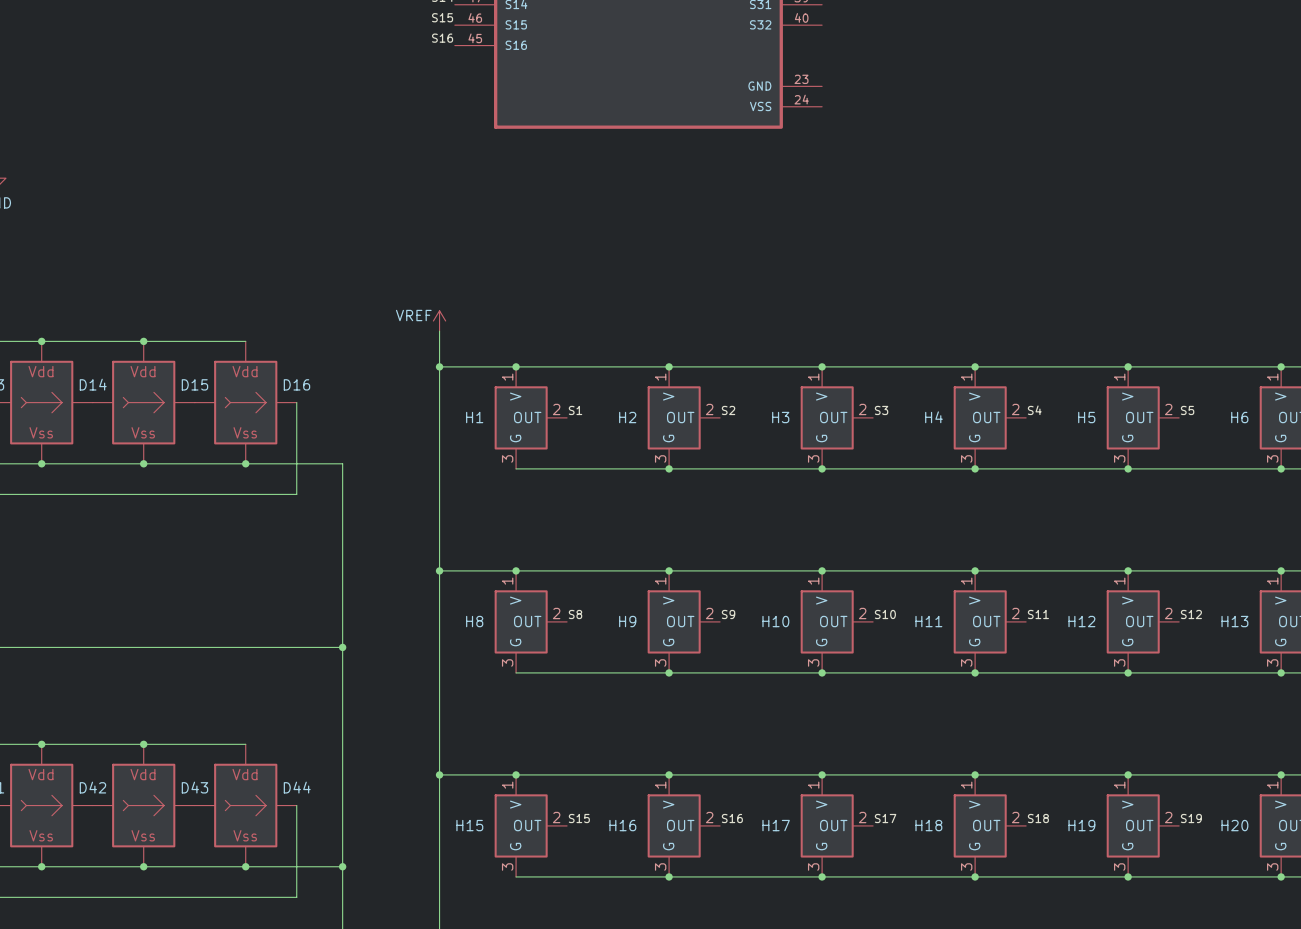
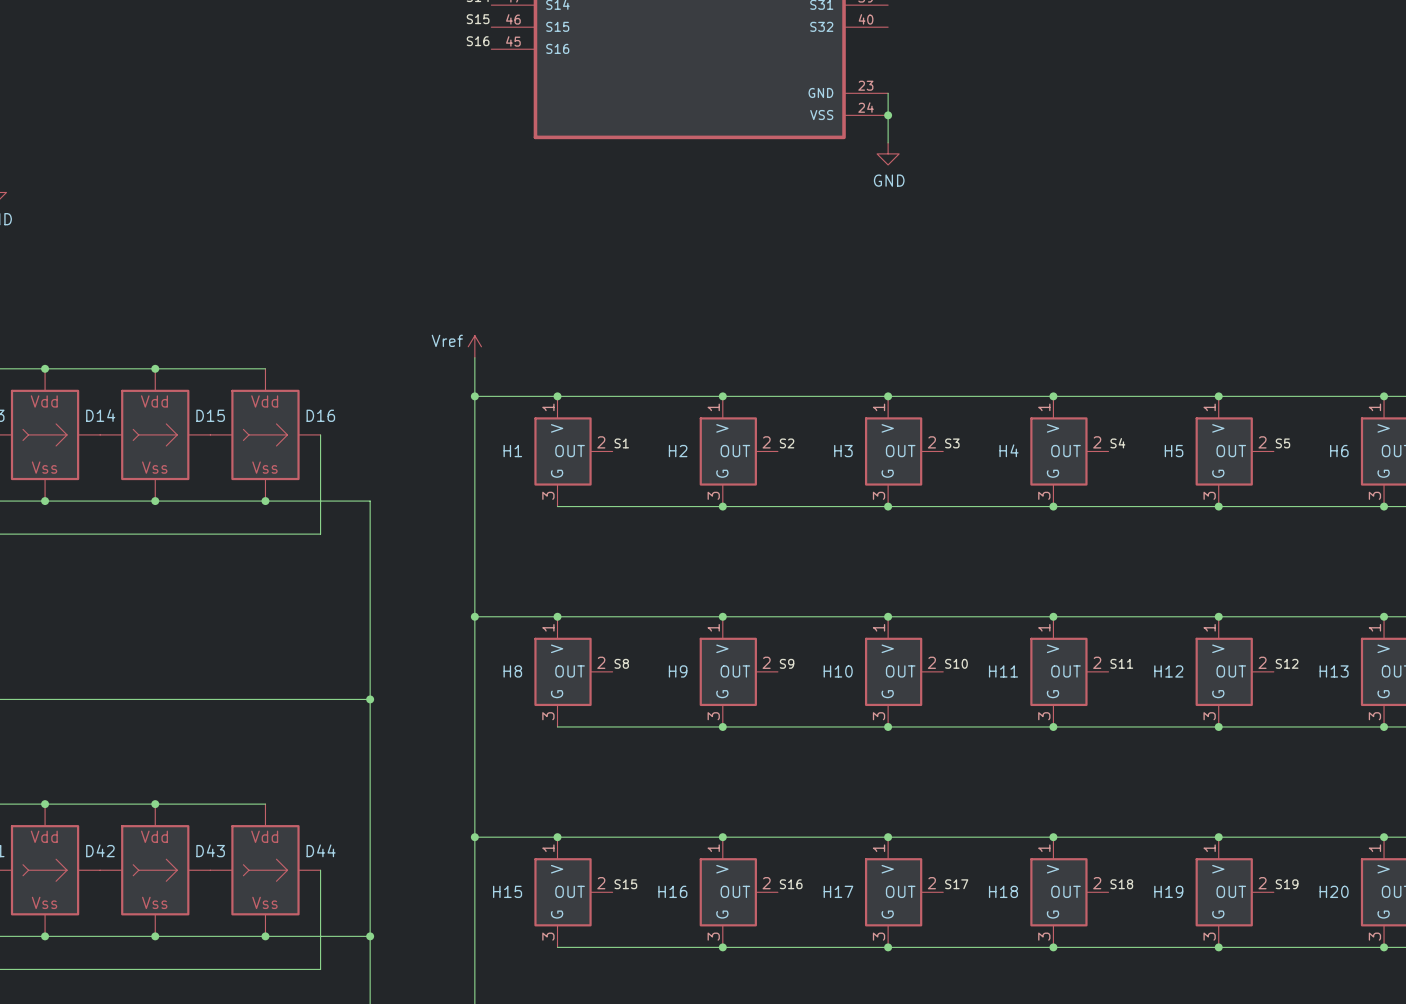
wire: none -> (888, 93) (888, 142)
junction: none -> (888, 115)
power symbol: none -> GND (888, 153)
power symbol: VREF (439, 320) -> Vref (474, 346)

